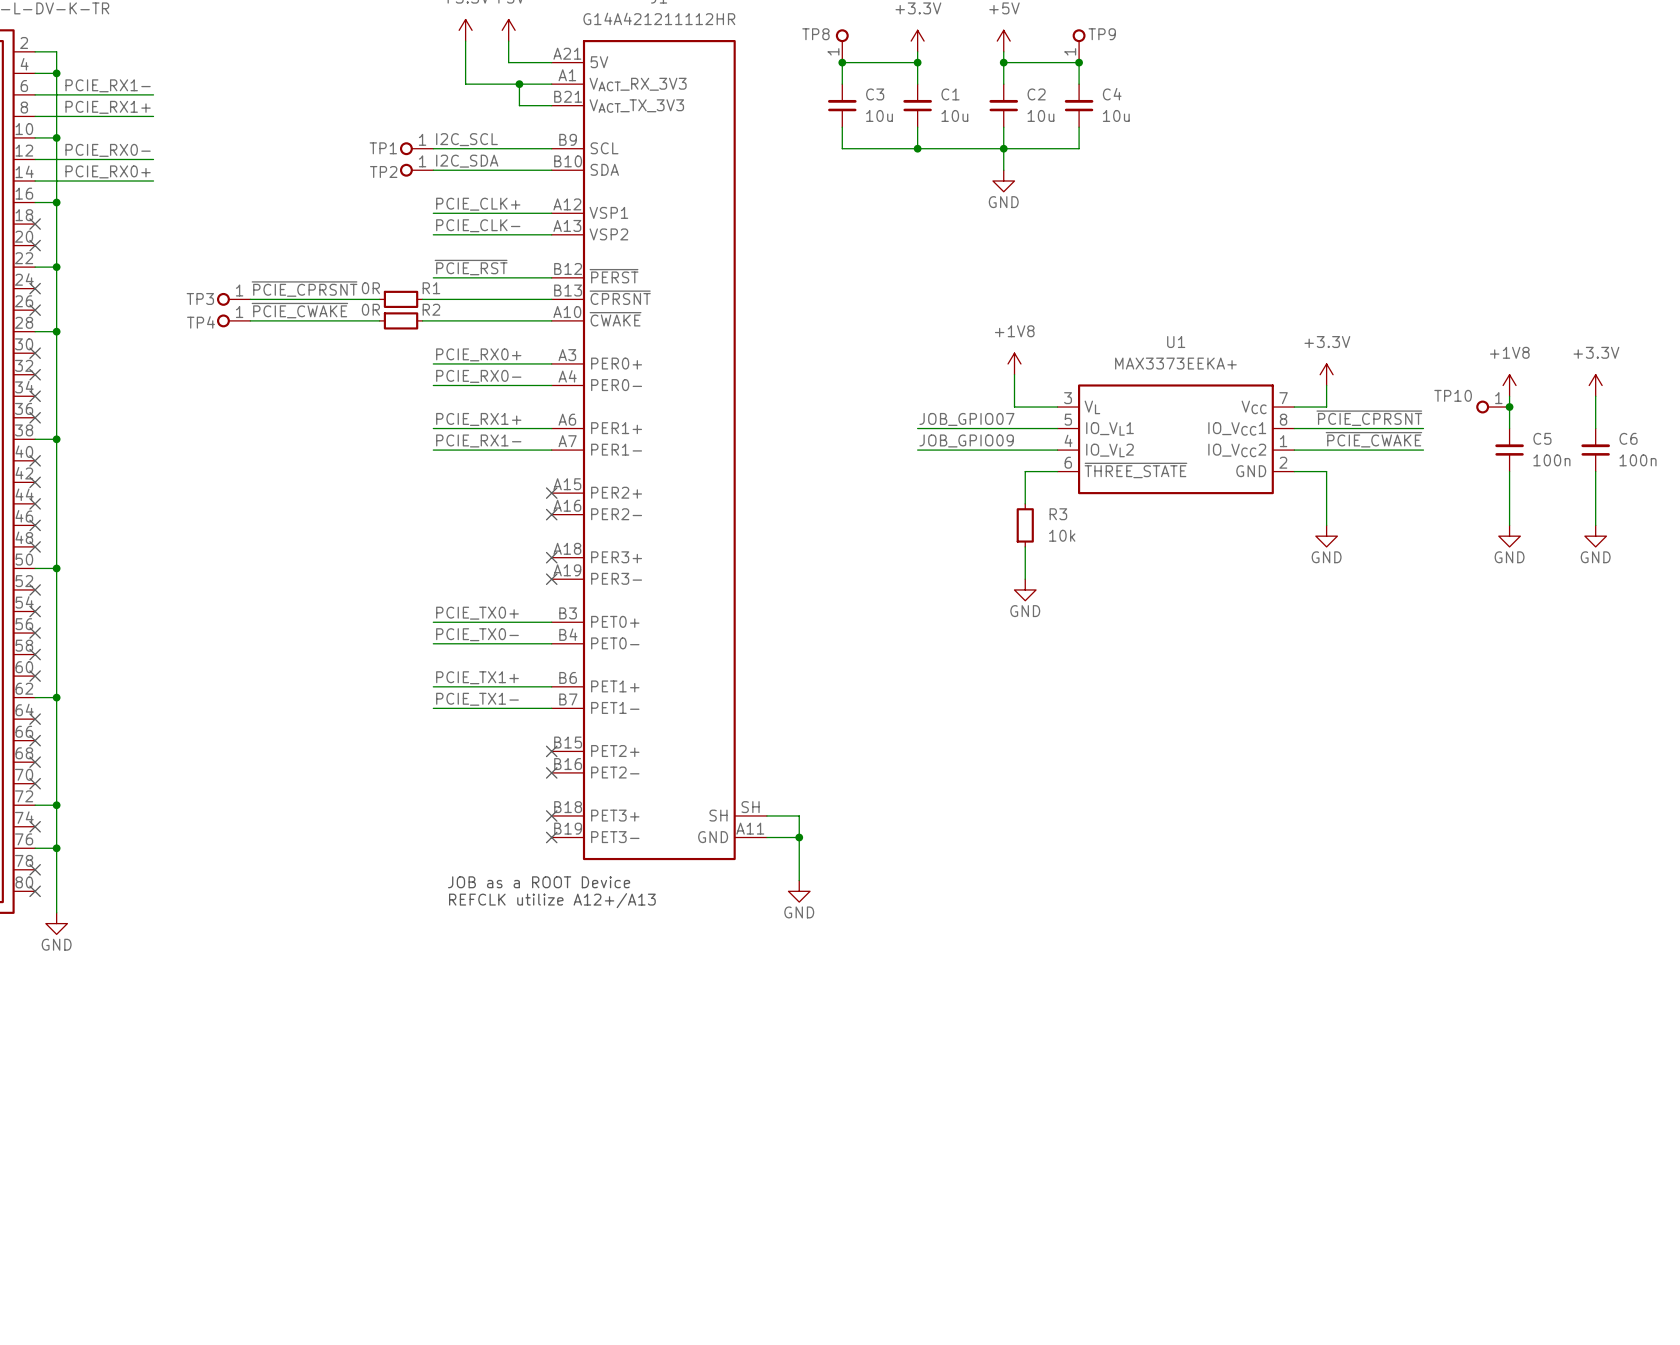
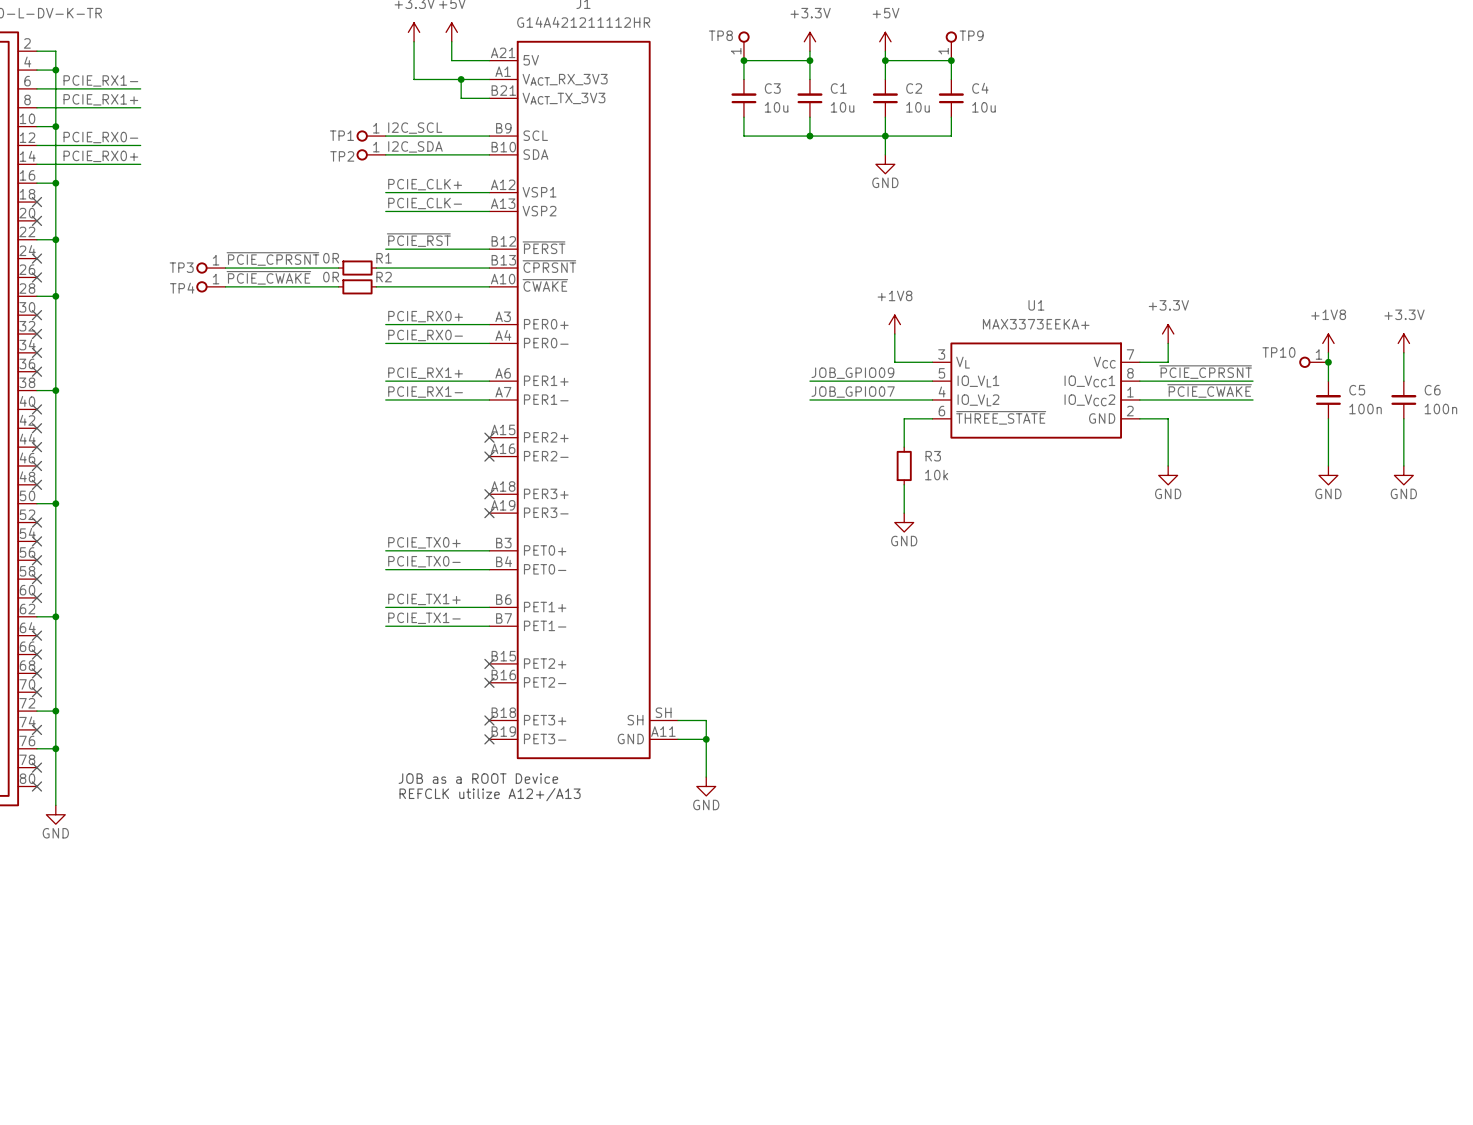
label: JOB_GPIO07 (966, 419) -> JOB_GPIO09 (852, 373)
label: JOB_GPIO09 (966, 440) -> JOB_GPIO07 (853, 392)

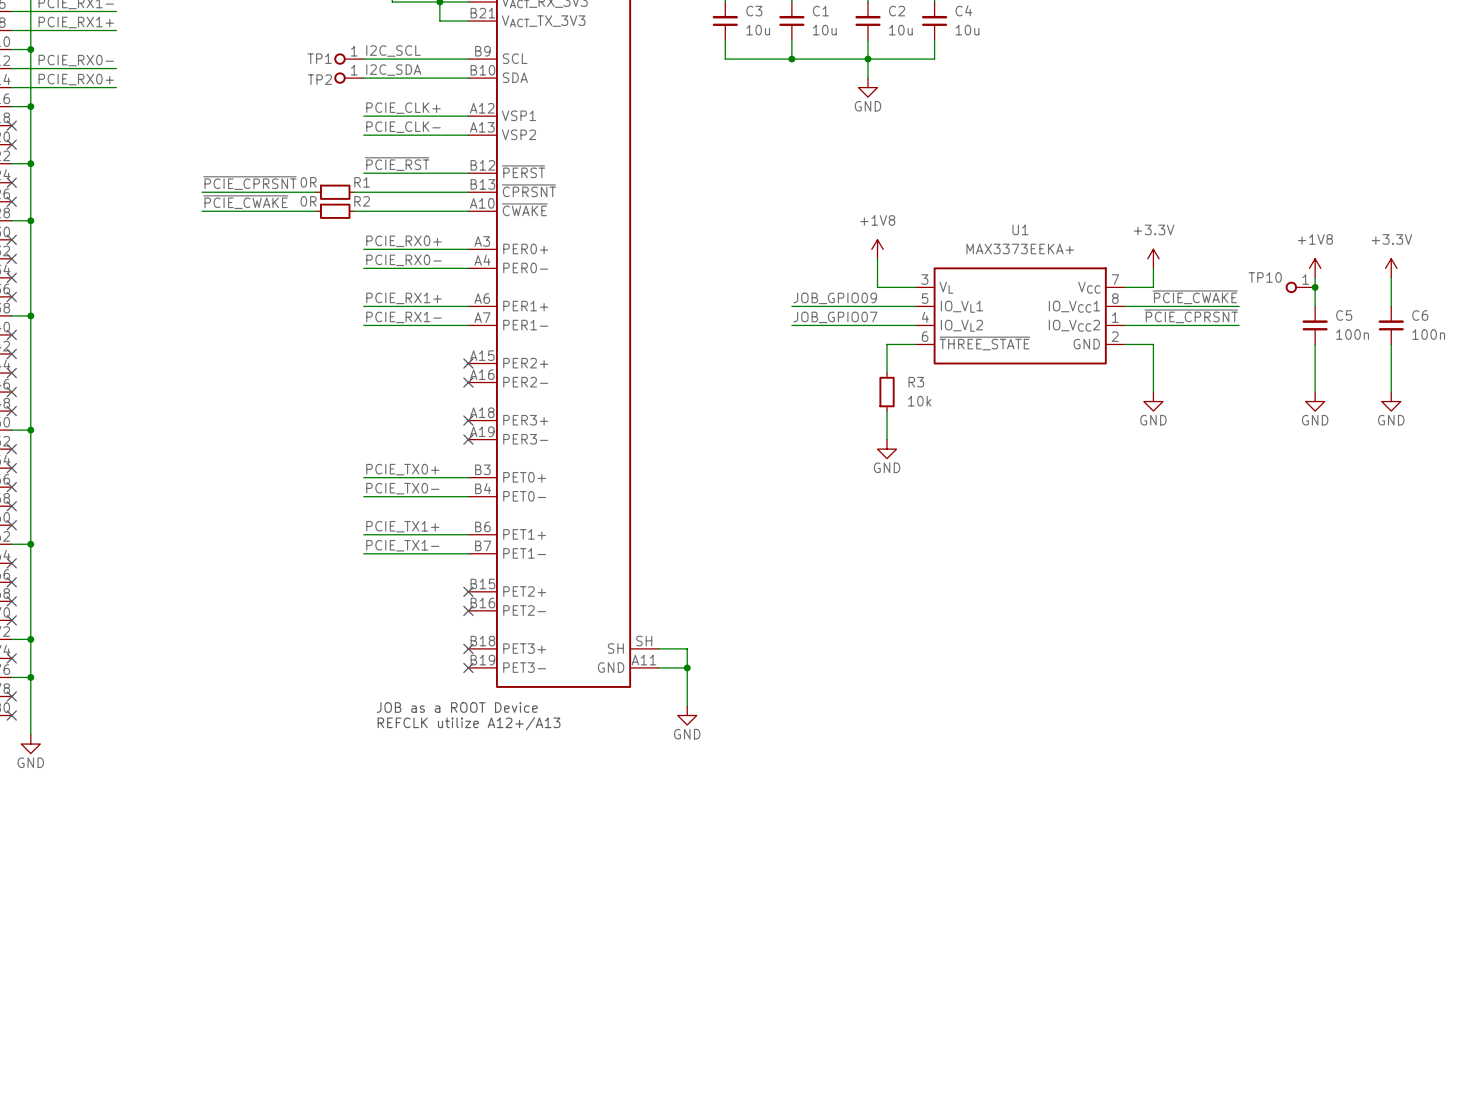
TP3: (210, 268) -> none
TP4: (210, 286) -> none
label: ~{PCIE_CPRSNT} (1205, 372) -> ~{PCIE_CWAKE} (1195, 297)
label: ~{PCIE_CWAKE} (1209, 390) -> ~{PCIE_CPRSNT} (1191, 316)

